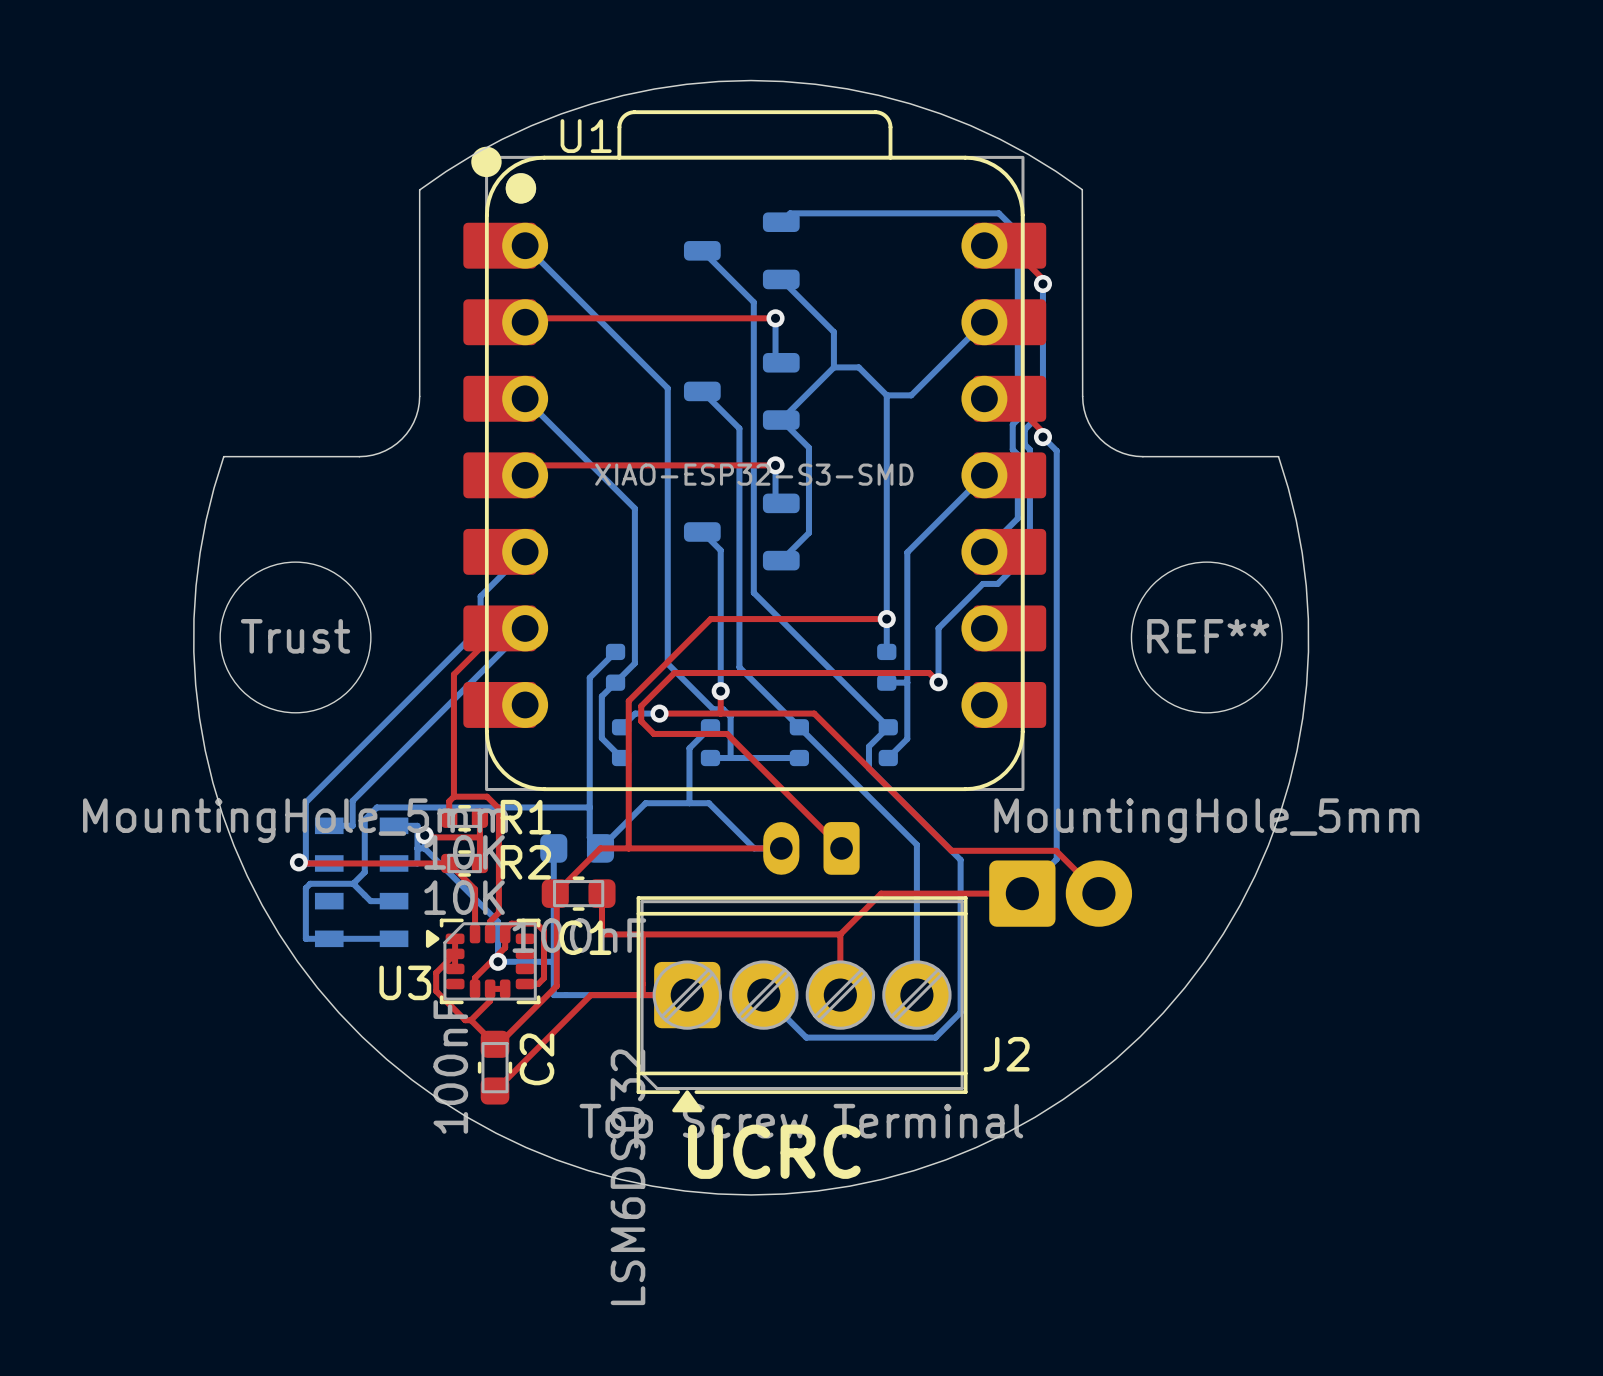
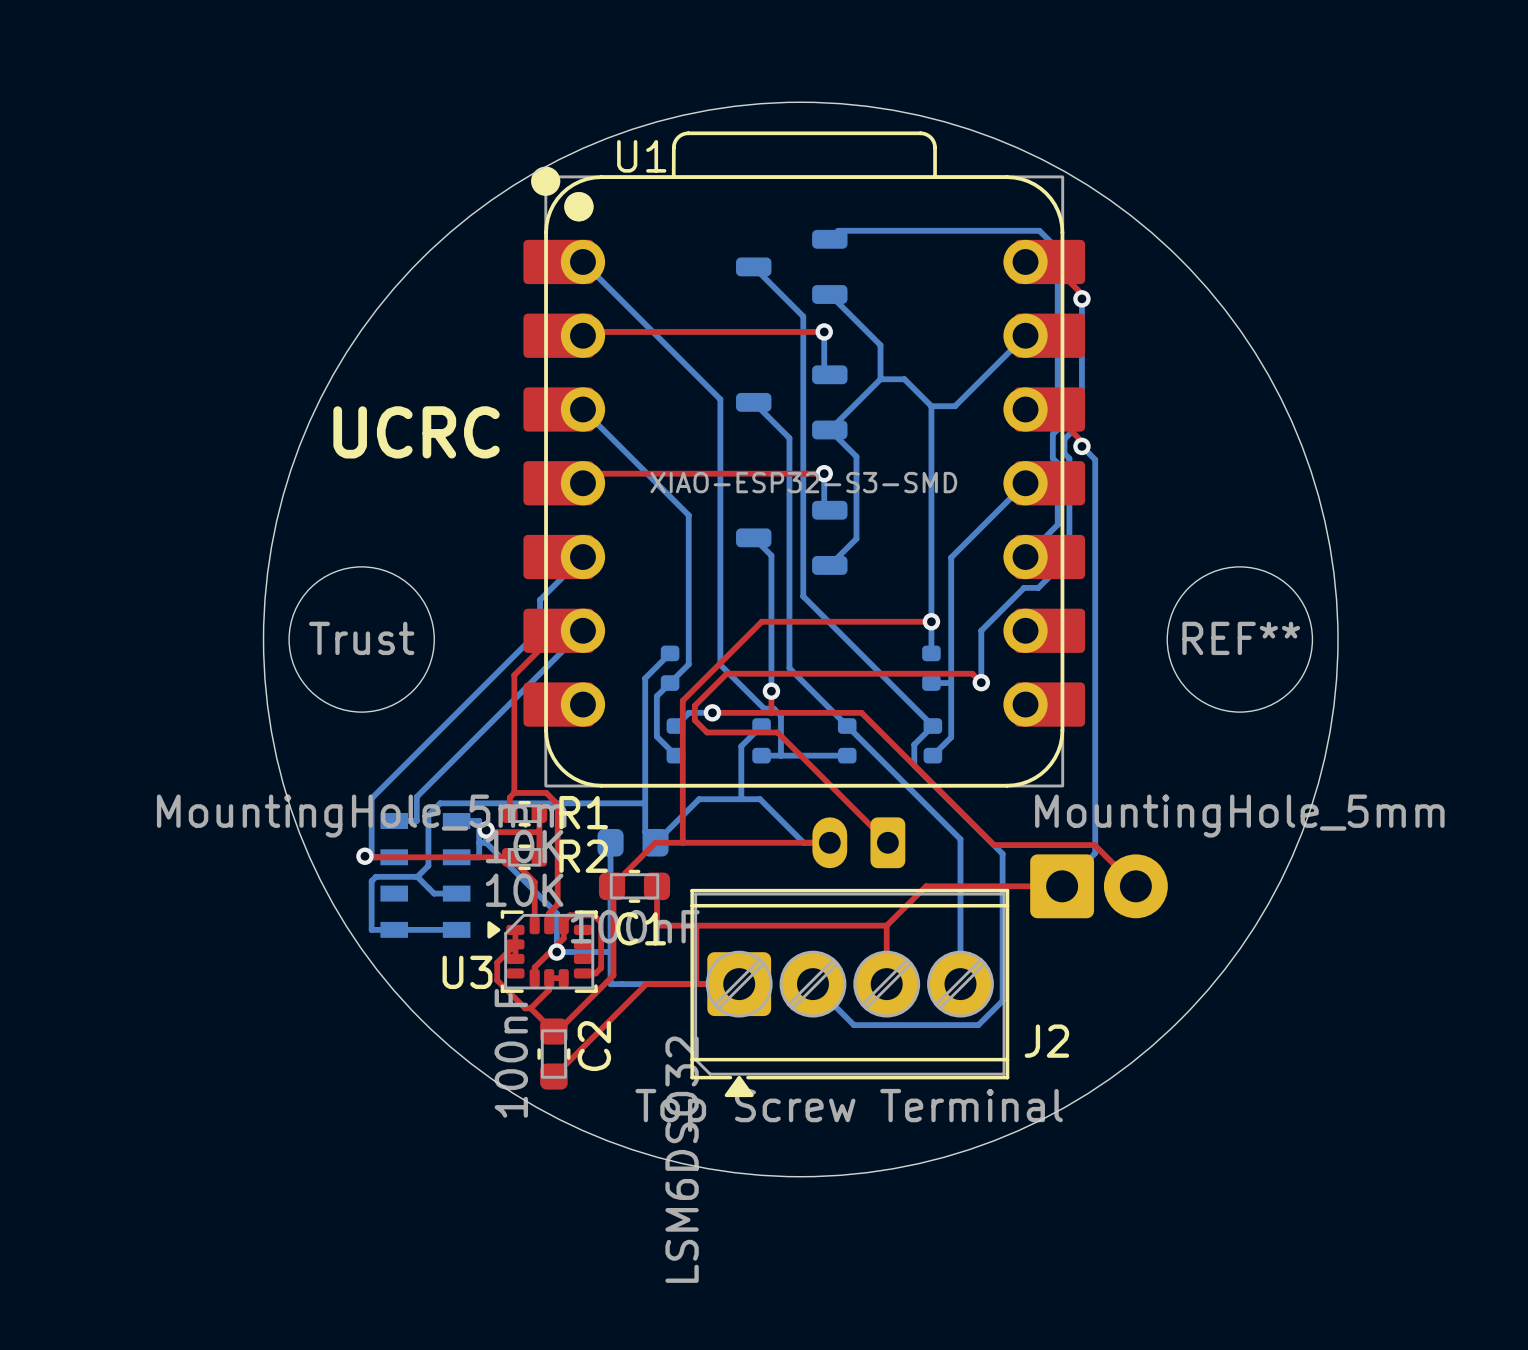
round board edge: none -> [262, 101, 1339, 1178]
board edge: (1082, 189) (1082, 396) (1086, 416) (1091, 428) (1100, 439) (1110, 447) (1123, 453) (1136, 456) (1278, 456) (1296, 520) (1302, 553) (1306, 585) (1308, 652) (1306, 685) (1297, 750) (1279, 814) (1255, 875) (1223, 934) (1204, 961) (1163, 1012) (1140, 1036) (1090, 1080) (1035, 1117) (976, 1147) (945, 1159) (882, 1179) (817, 1191) (751, 1194) (685, 1191) (652, 1186) (587, 1170) (556, 1159) (496, 1133) (439, 1099) (412, 1080) (362, 1036) (317, 987) (279, 934) (247, 875) (222, 814) (205, 750) (195, 685) (193, 618) (200, 553) (206, 520) (223, 456) (372, 455) (385, 450) (396, 443) (406, 433) (413, 422) (418, 409) (419, 396) (419, 189) (446, 171) (502, 139) (561, 113) (591, 103) (623, 95) (686, 84) (750, 80) (783, 81) (847, 88) (909, 103) (940, 113) (970, 125) (1028, 154) (1082, 189) -> none
text: none -> UCRC (416, 432)
text: UCRC (774, 1151) -> none

